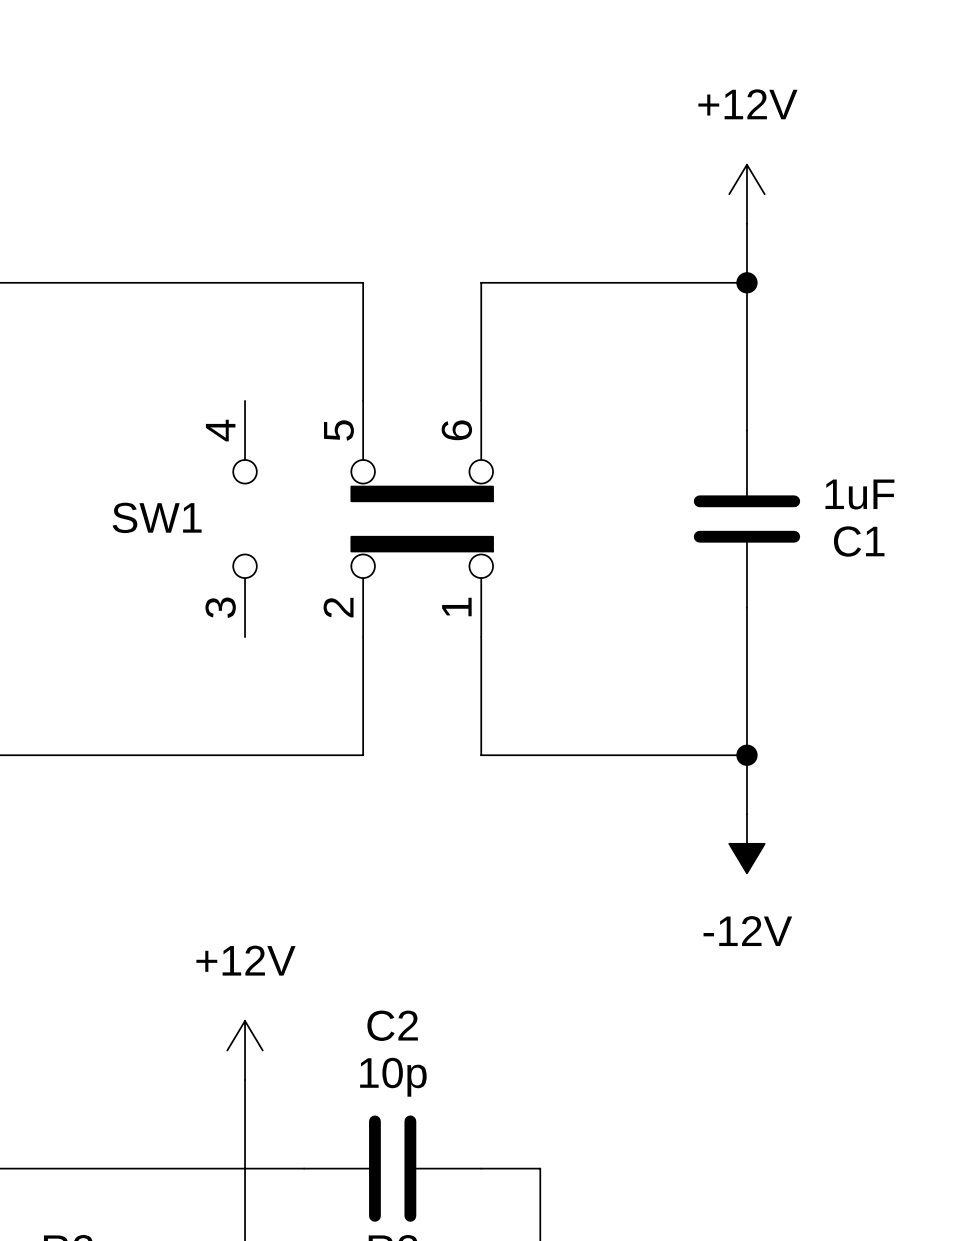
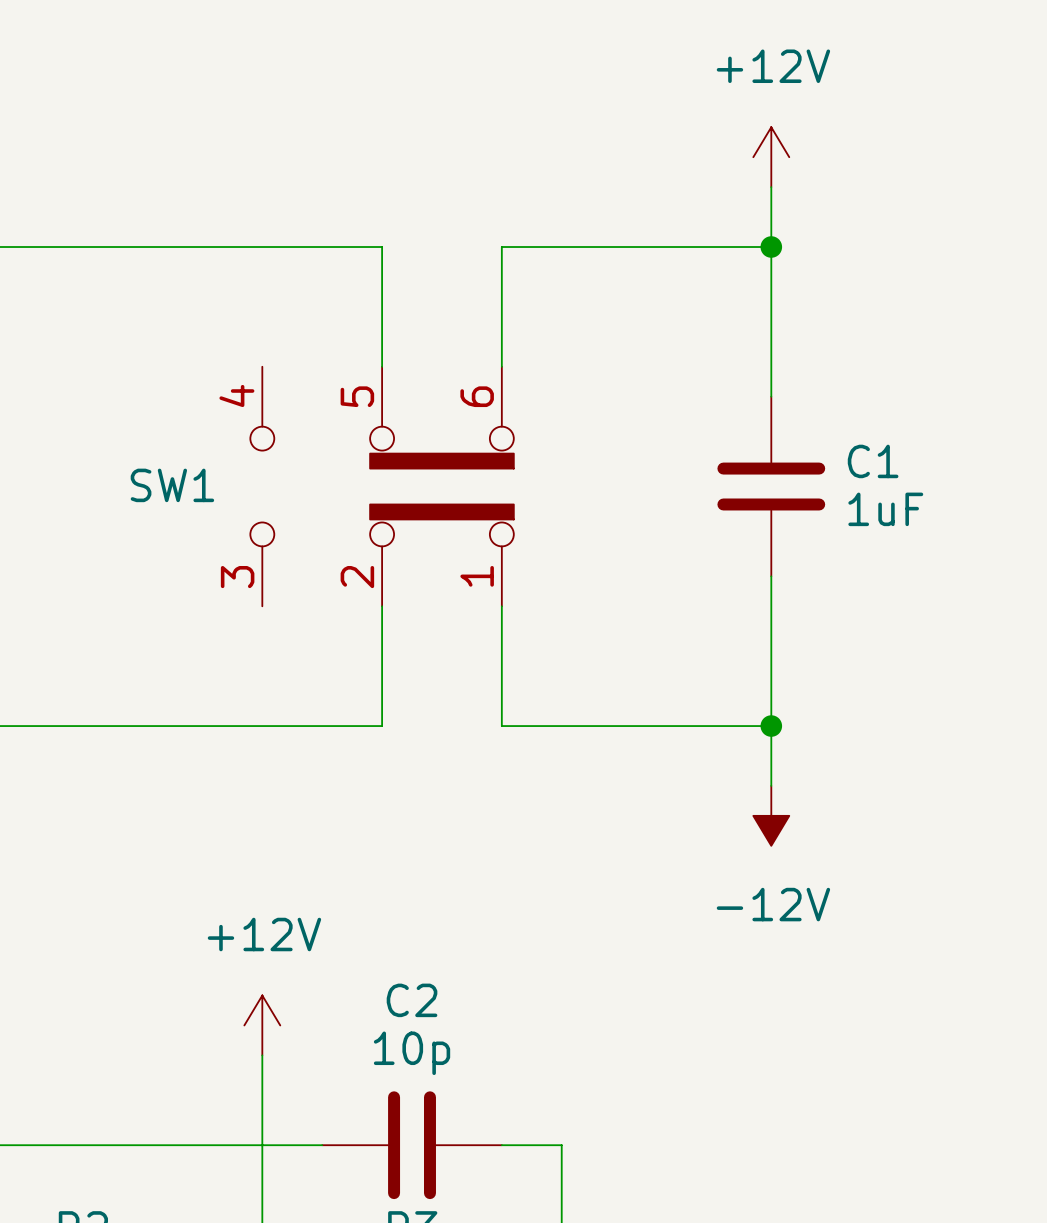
C1 value position: 1uF (859, 494) -> 1uF (885, 509)
C1 name position: C1 (859, 541) -> C1 (873, 461)

